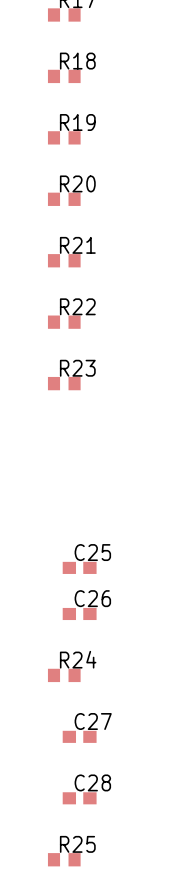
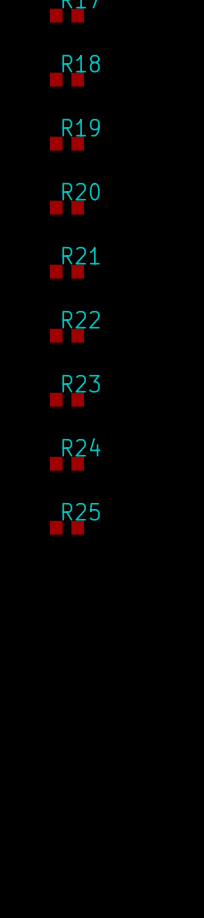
C25: (79, 567) -> none
C26: (79, 613) -> none
R24 position: (64, 675) -> (66, 463)
C27: (79, 736) -> none
C28: (79, 798) -> none
R25 position: (64, 859) -> (66, 527)

